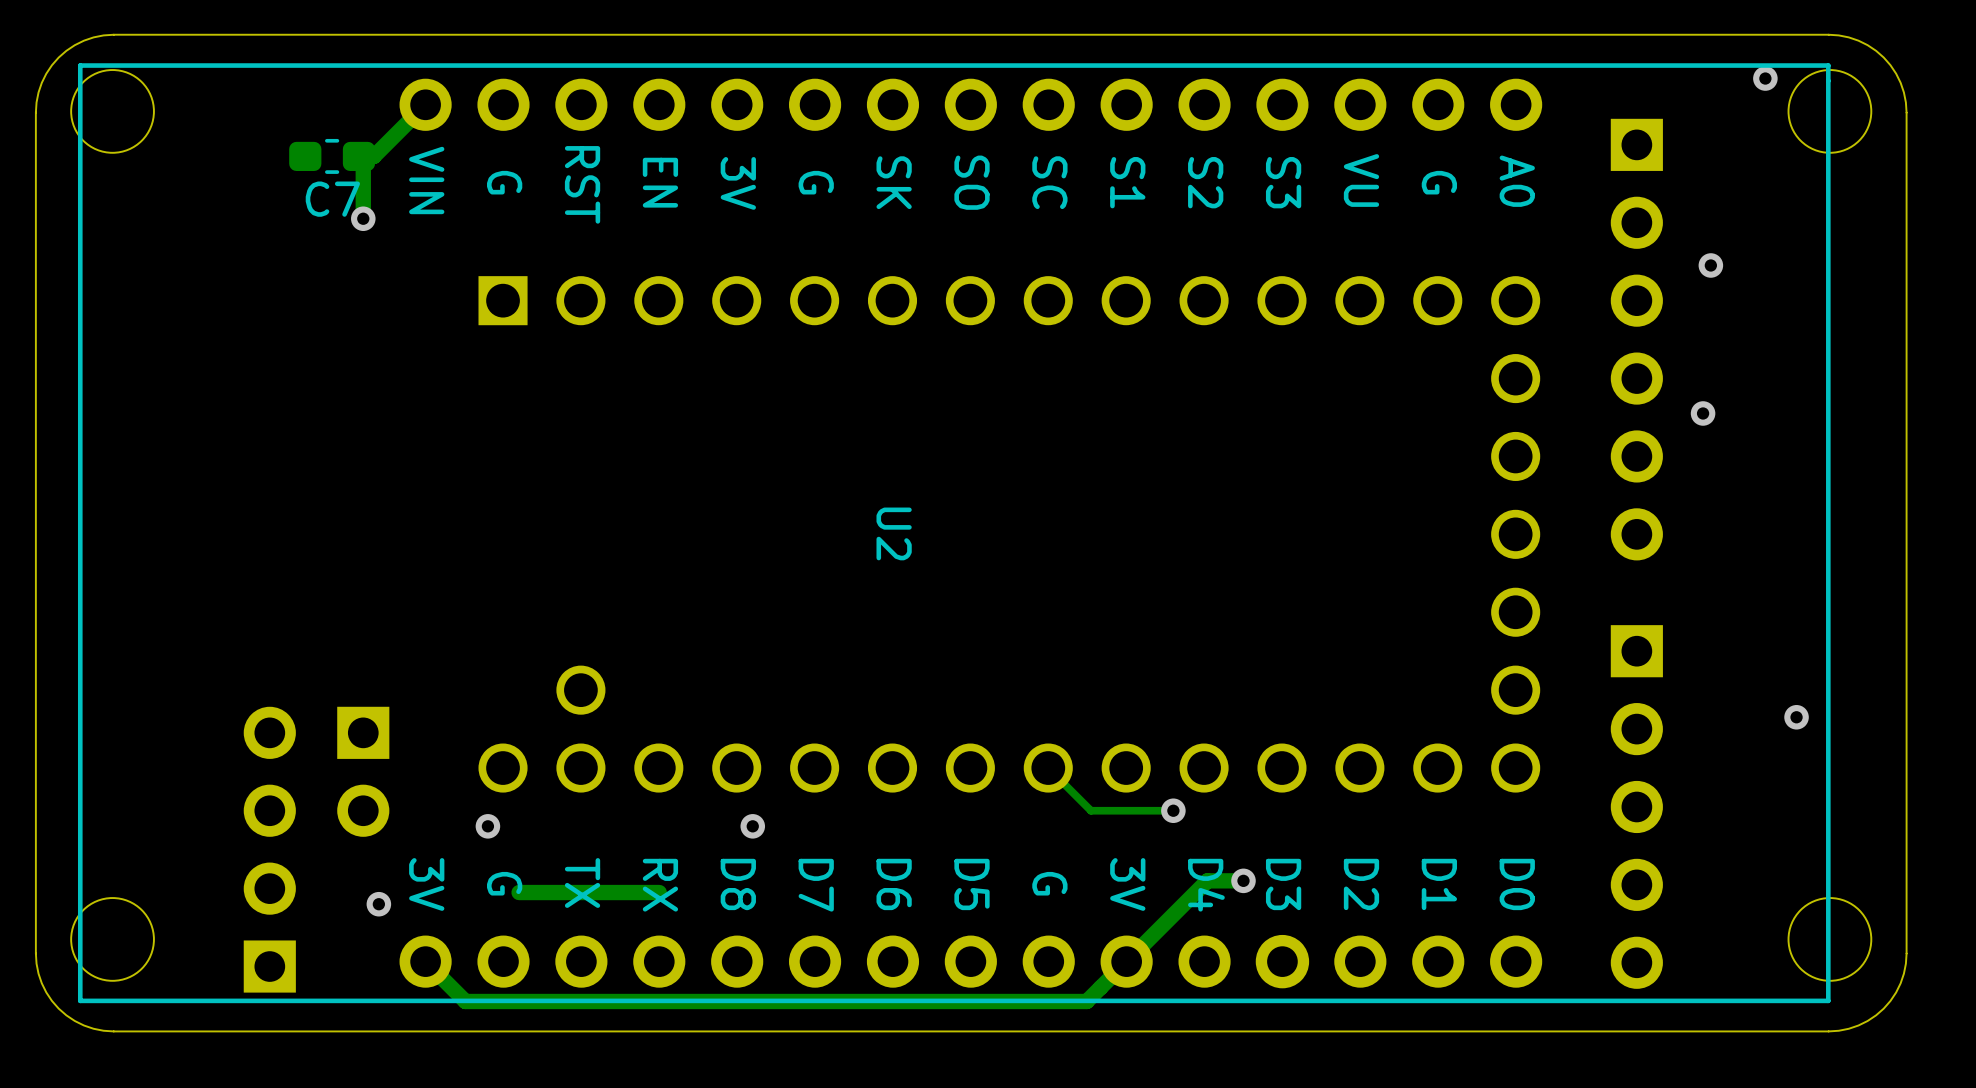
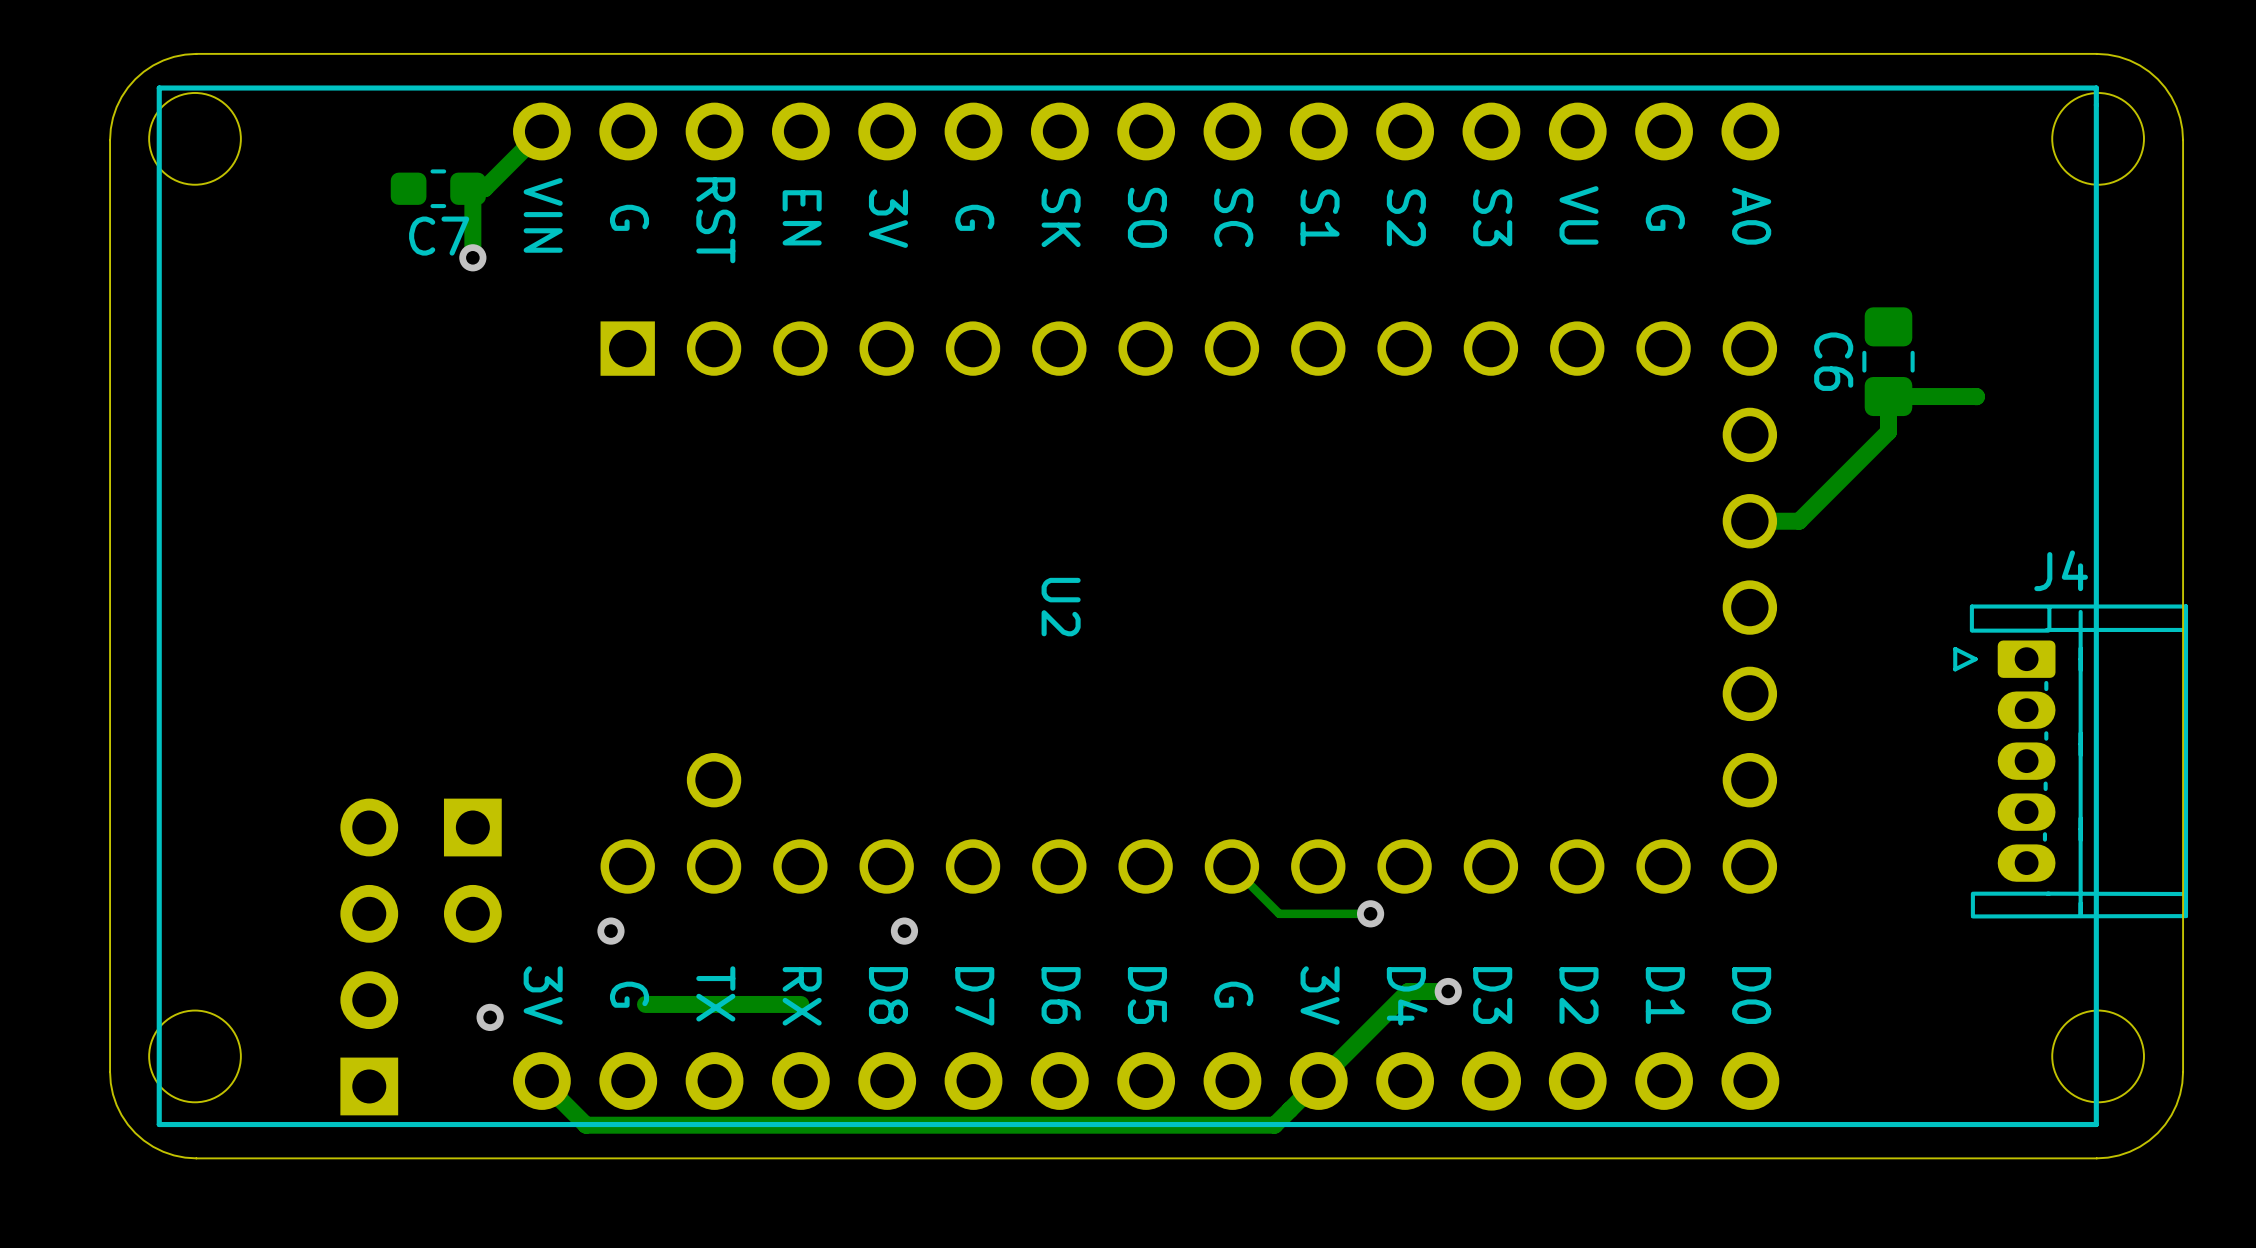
via: (1765, 78) -> none
via: (1710, 265) -> none
C6: none -> (1888, 361)
part: (1636, 339) -> none
track: none -> (1888, 396) (1888, 431) (1799, 521) (1749, 521)
track: none -> (1976, 396) (1888, 396)
via: (1703, 413) -> none
J4: none -> (2070, 761)
via: (1796, 717) -> none
part: (1636, 806) -> none

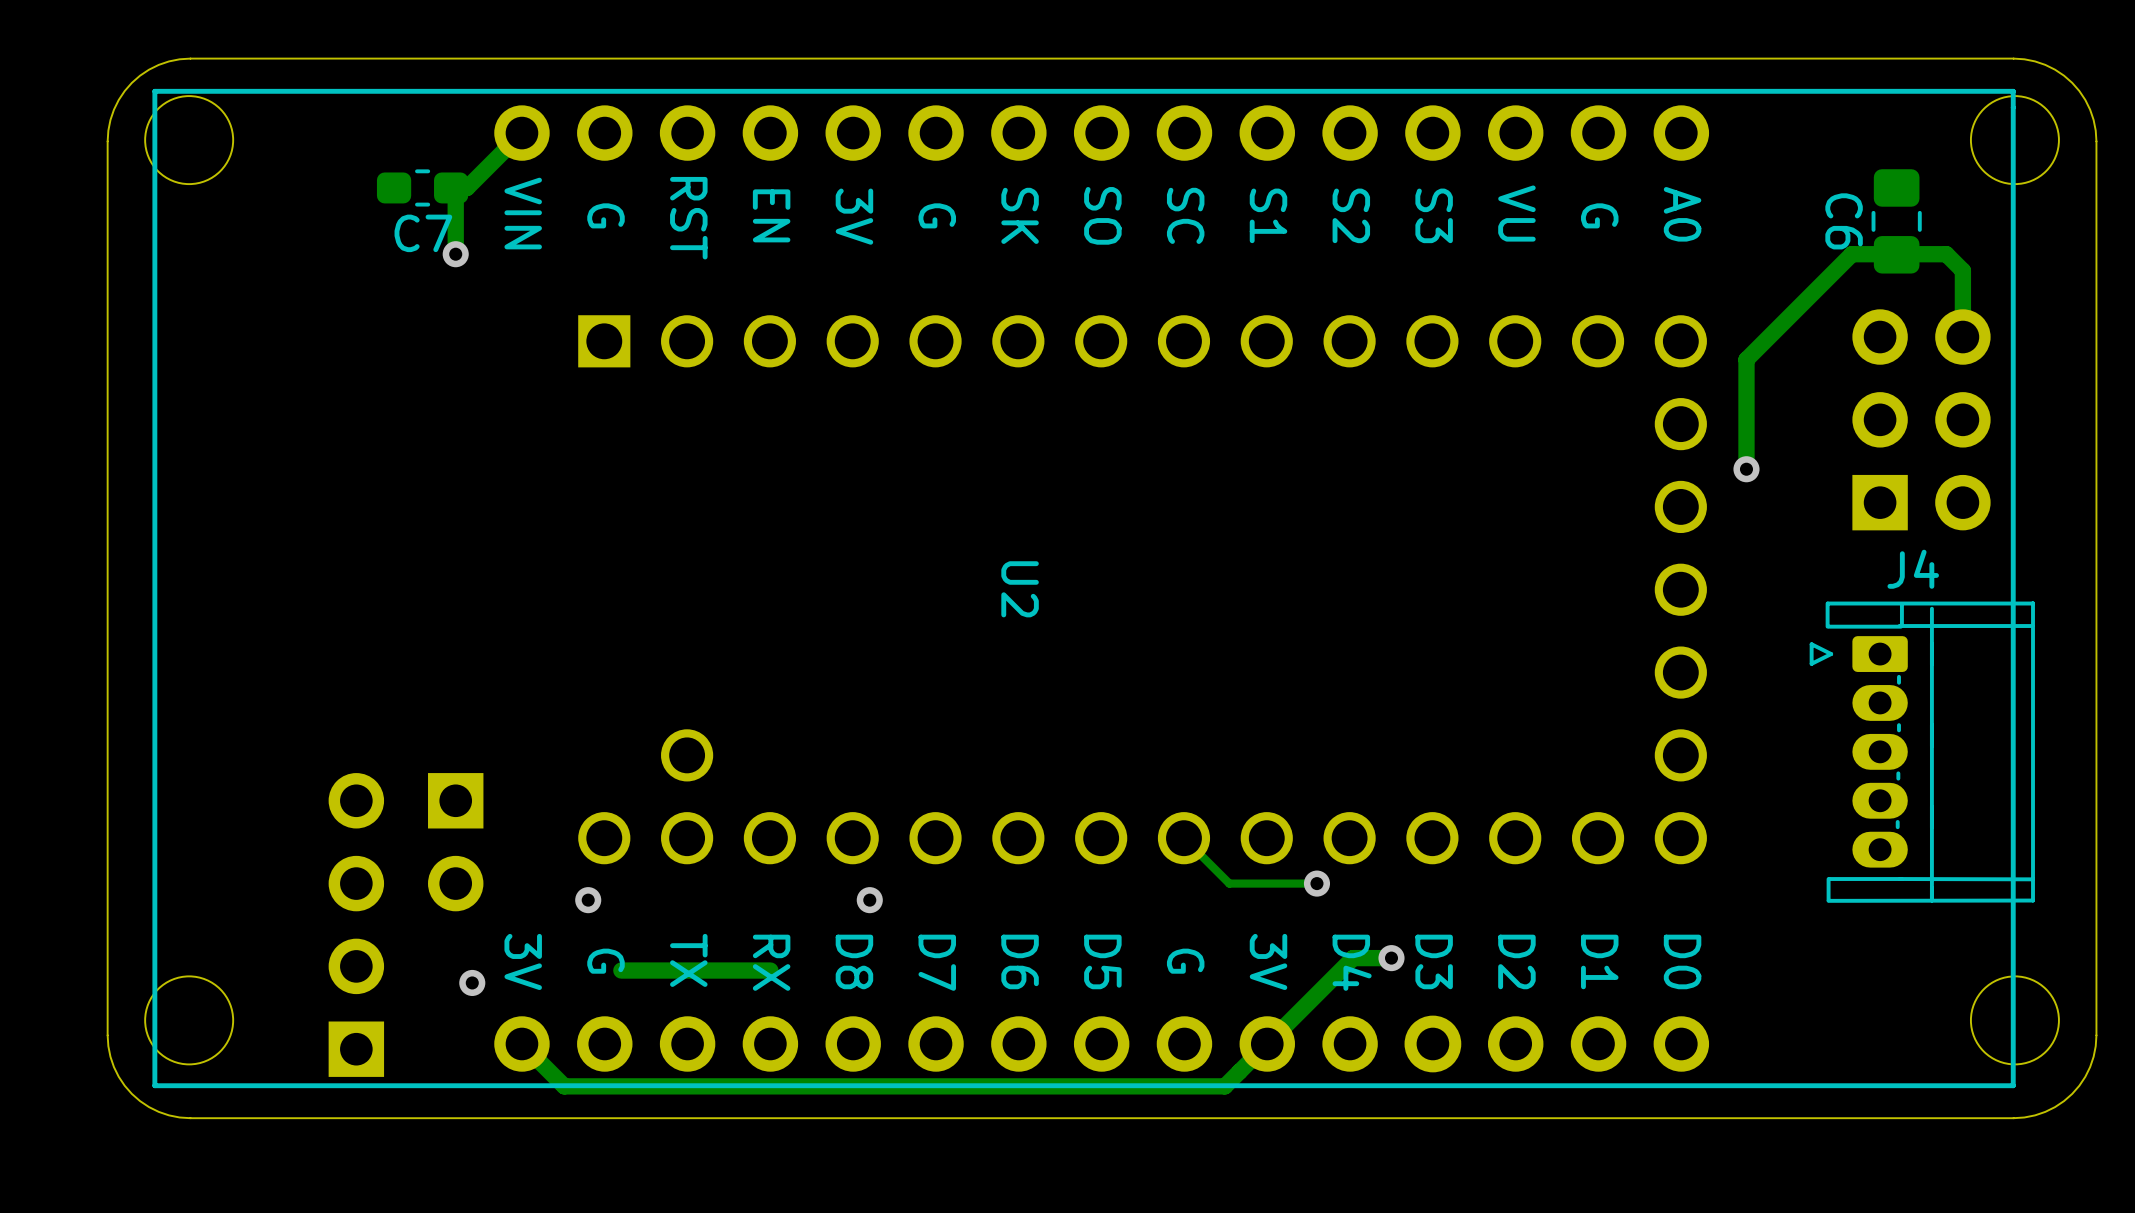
track: none -> (1962, 337) (1962, 270) (1946, 254) (1851, 254) (1746, 359) (1746, 469)
C6 position: (1888, 361) -> (1896, 221)
track: (1888, 396) (1888, 431) (1799, 521) (1749, 521) -> none
track: (1976, 396) (1888, 396) -> none
part: none -> (1921, 419)
via: none -> (1746, 469)
J4 position: (2070, 761) -> (1922, 752)

